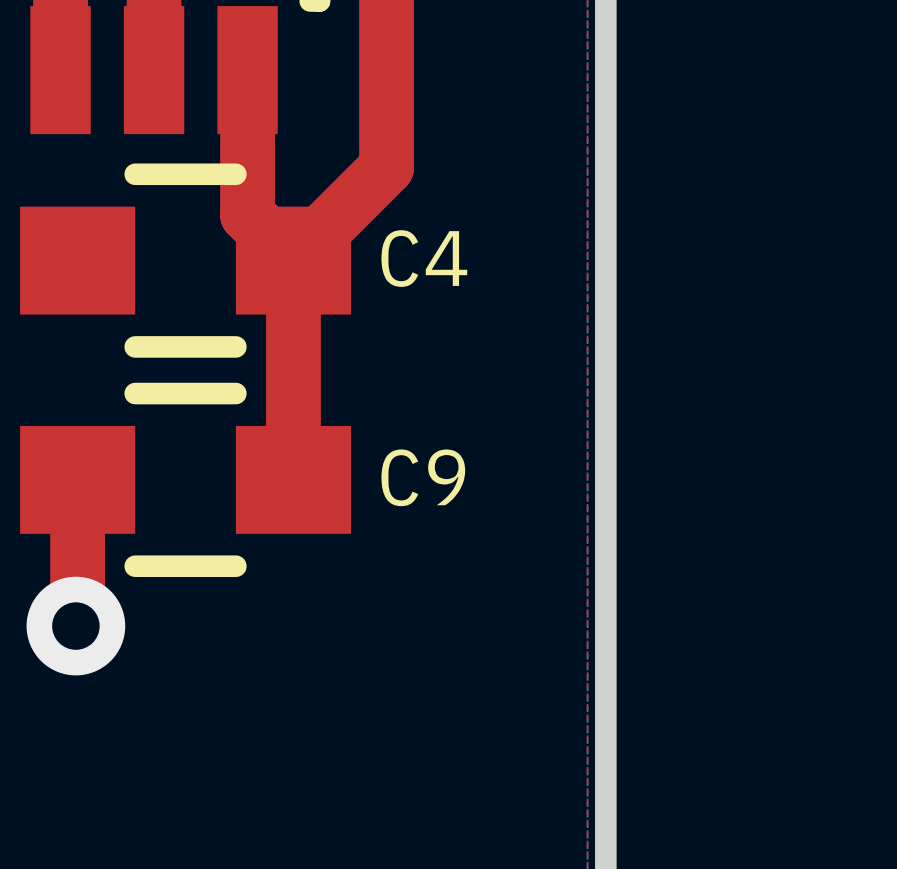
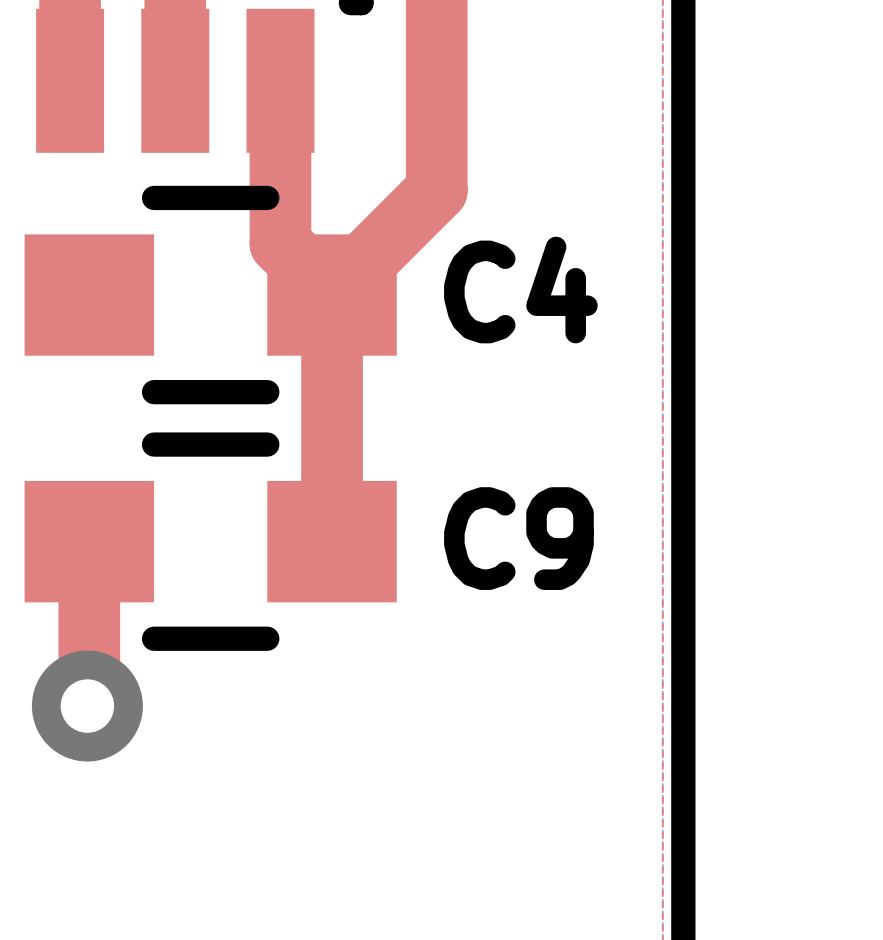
C4 name position: C4 (424, 258) -> C4 (520, 290)
C9 name position: C9 (423, 477) -> C9 (518, 538)

